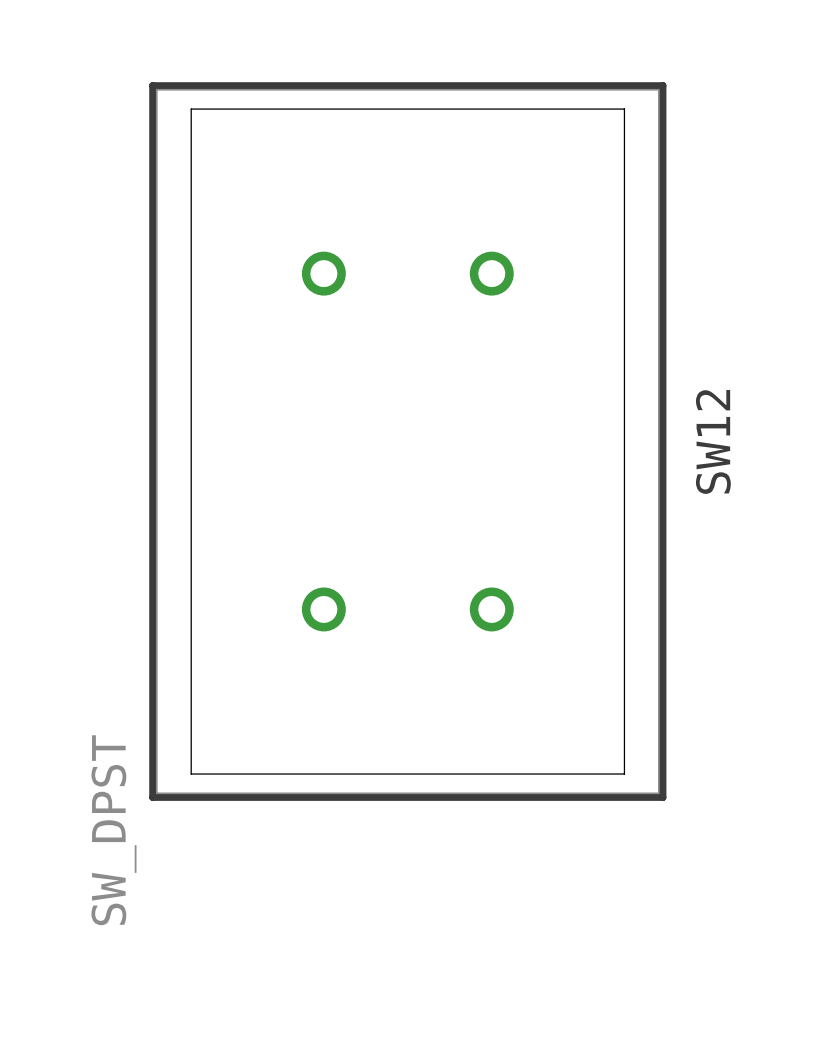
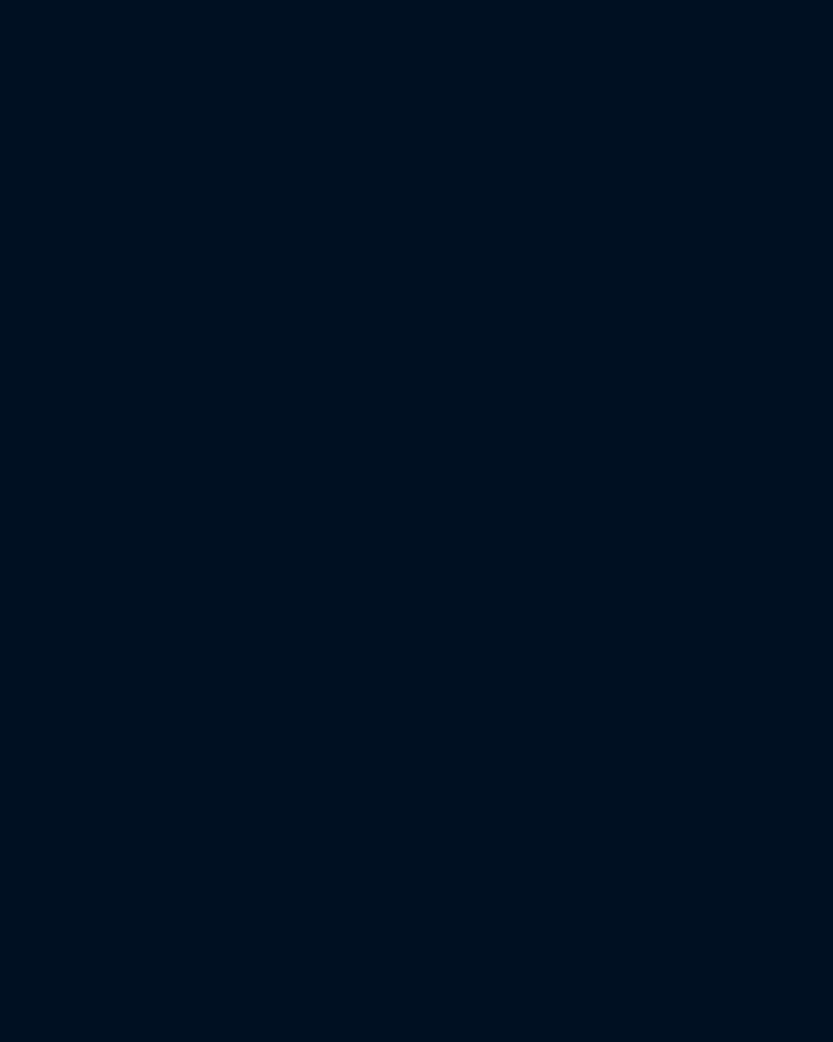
SW12: SW_DPST (407, 441) -> none

